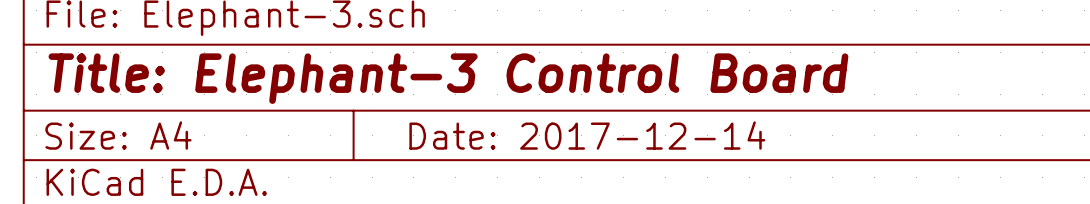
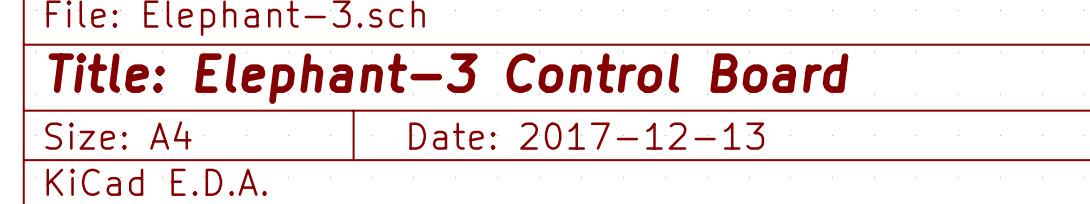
title block: Date: 2017-12-14 (587, 135) -> Date: 2017-12-13 (586, 136)

